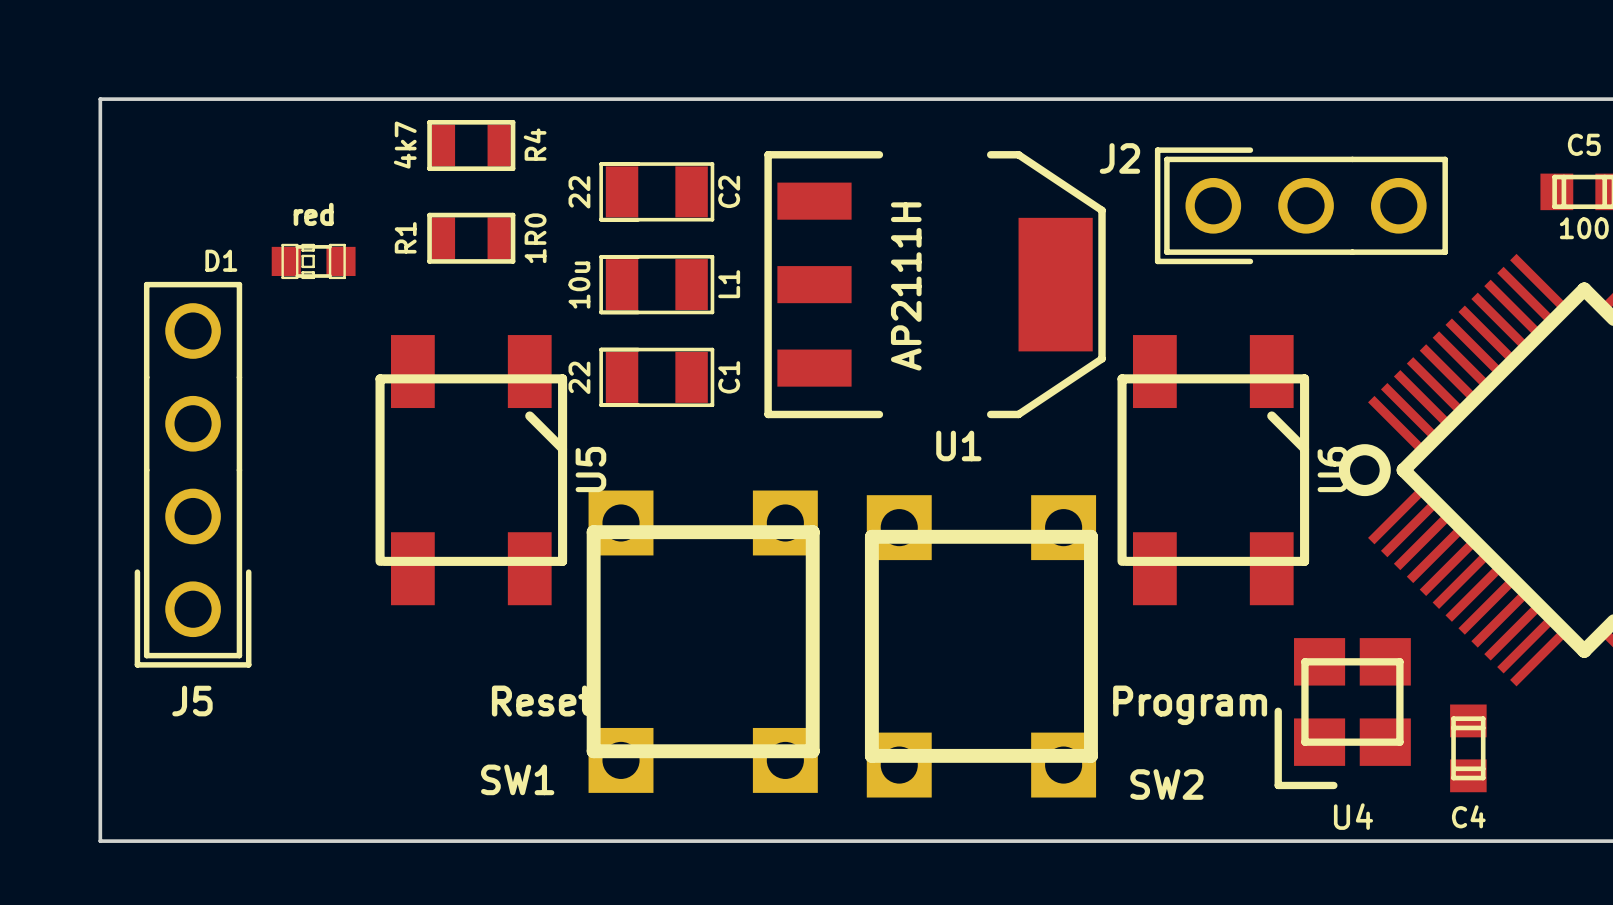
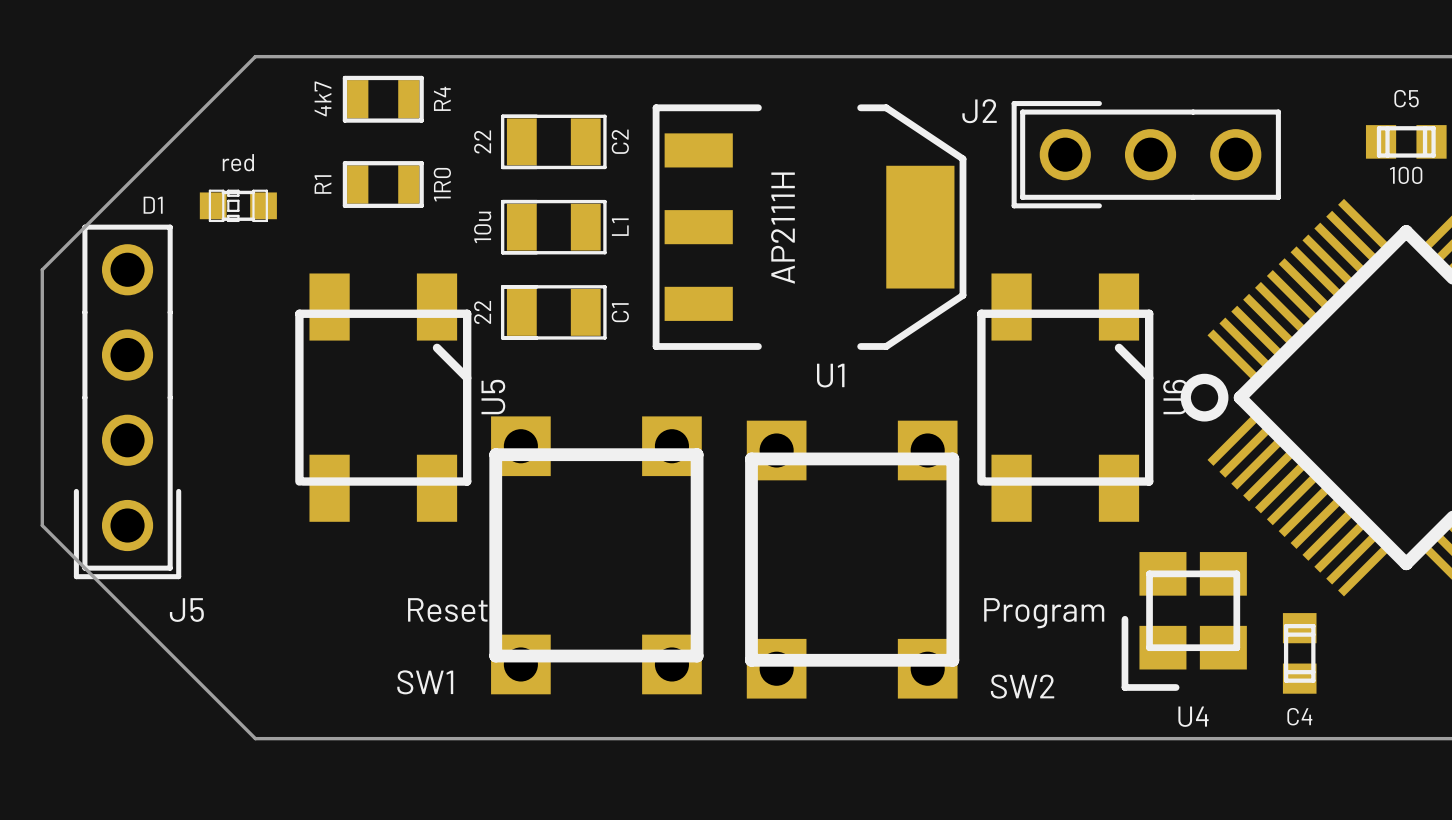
board edge: (332, 99) (100, 99) (100, 331) -> (255, 56) (42, 269)
board edge: (100, 609) (100, 841) (332, 841) -> (42, 525) (255, 738)
J5 name position: J5 (192, 701) -> J5 (186, 610)

